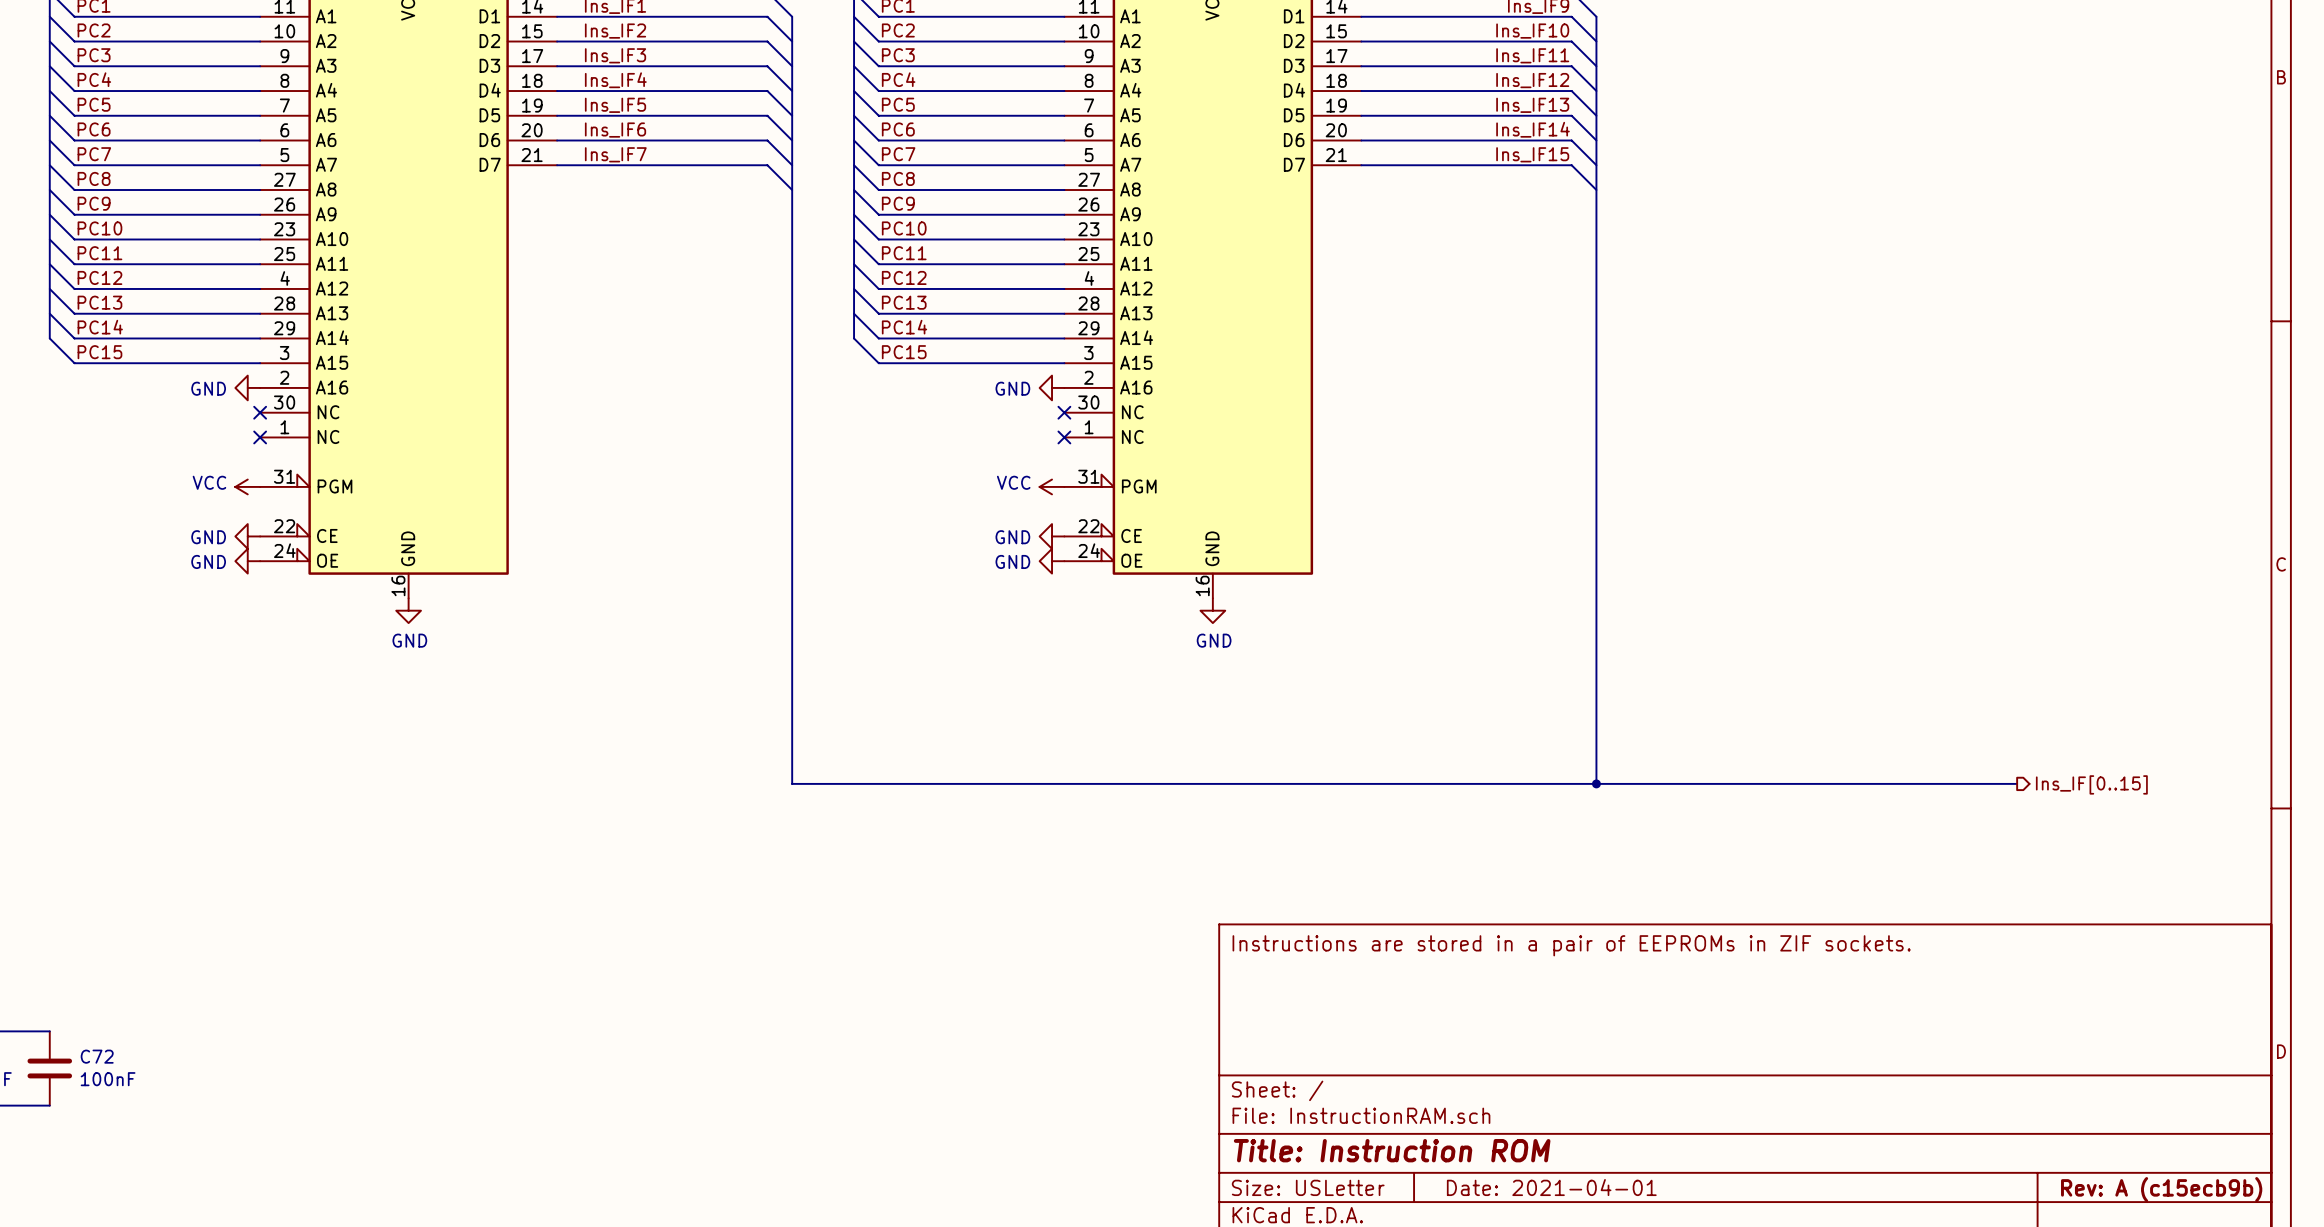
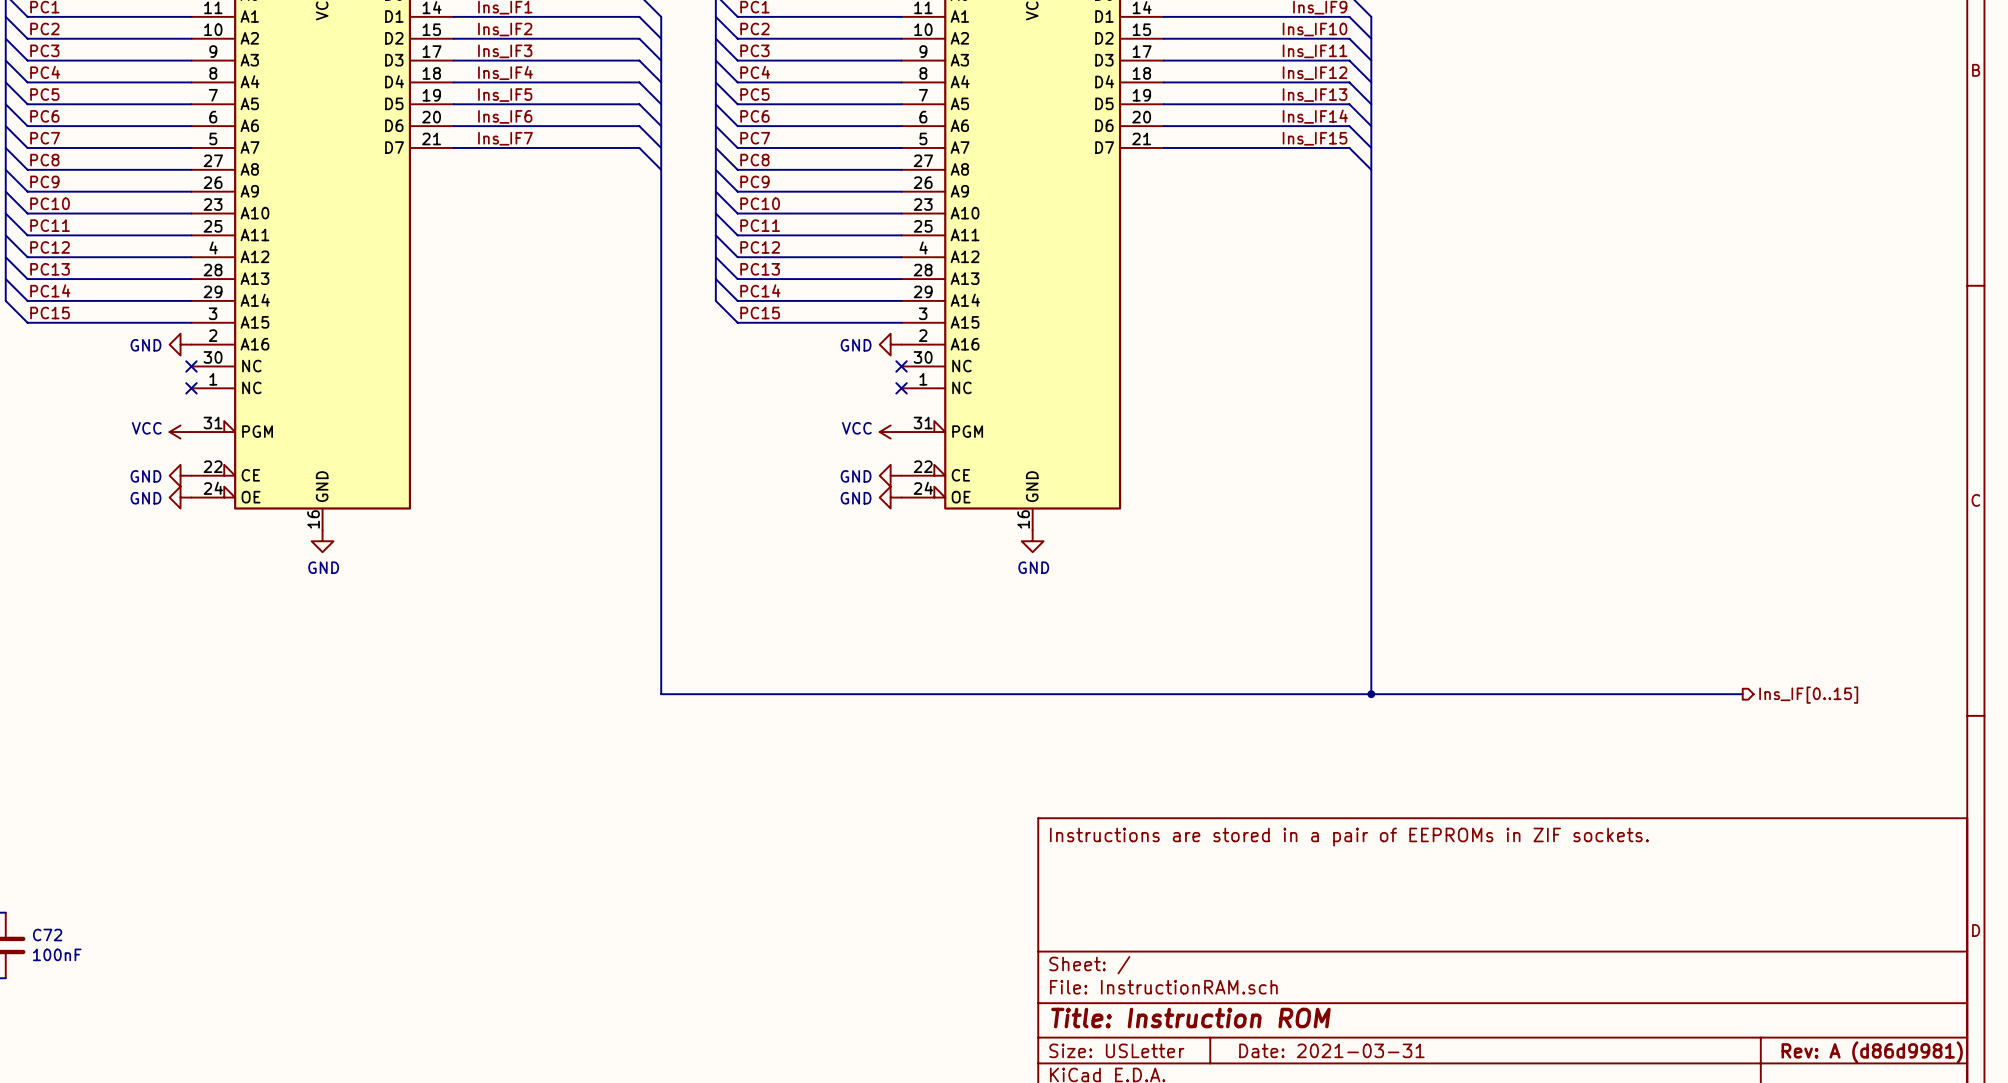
title block: Date: 2021-04-01 (1551, 1187) -> Date: 2021-03-31 (1331, 1050)
title block: Rev: A (c15ecb9b) (2161, 1189) -> Rev: A (d86d9981) (1872, 1052)

